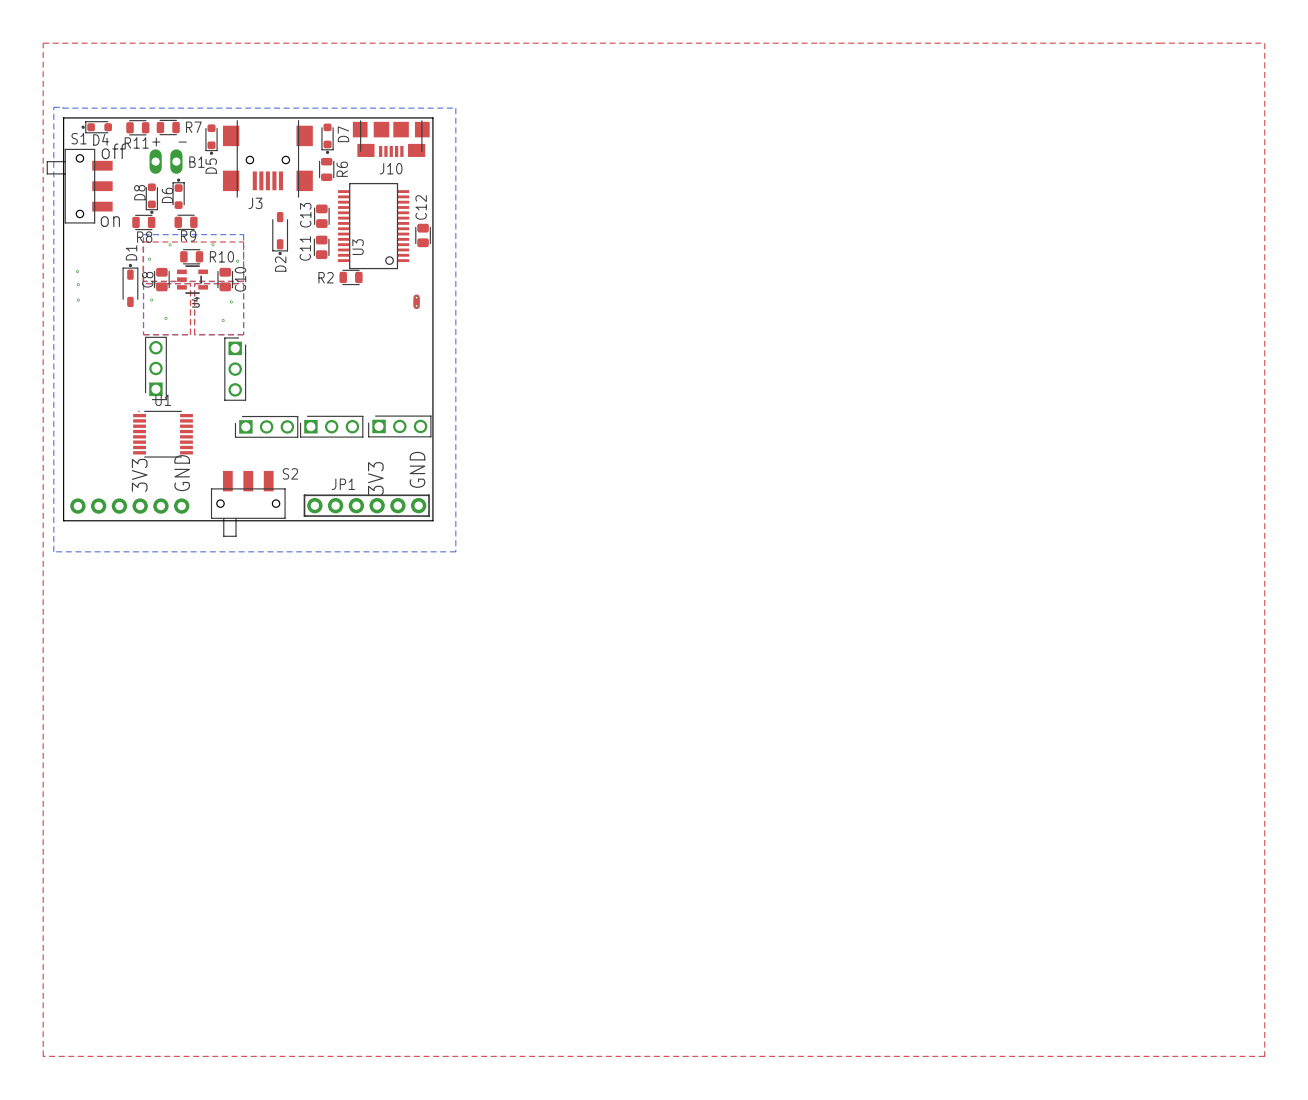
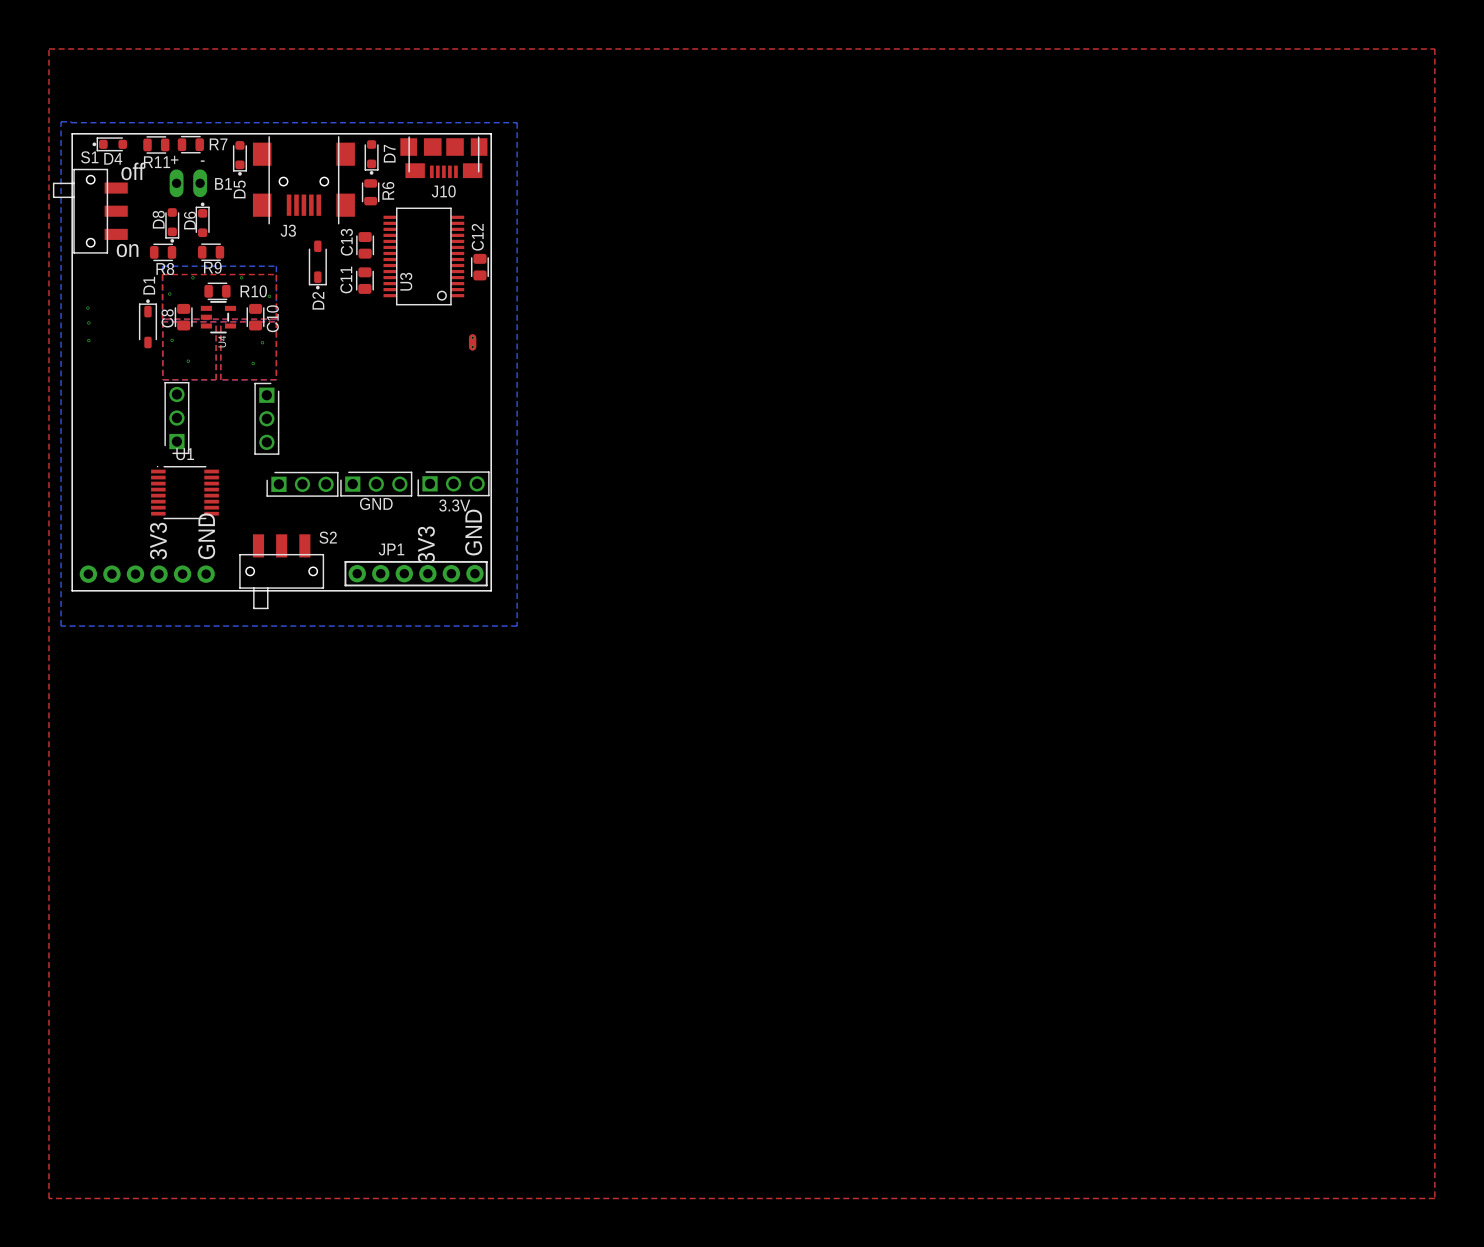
R2: (351, 277) -> none
GND name: none -> GND (376, 503)
3.3V name: none -> 3.3V (454, 505)

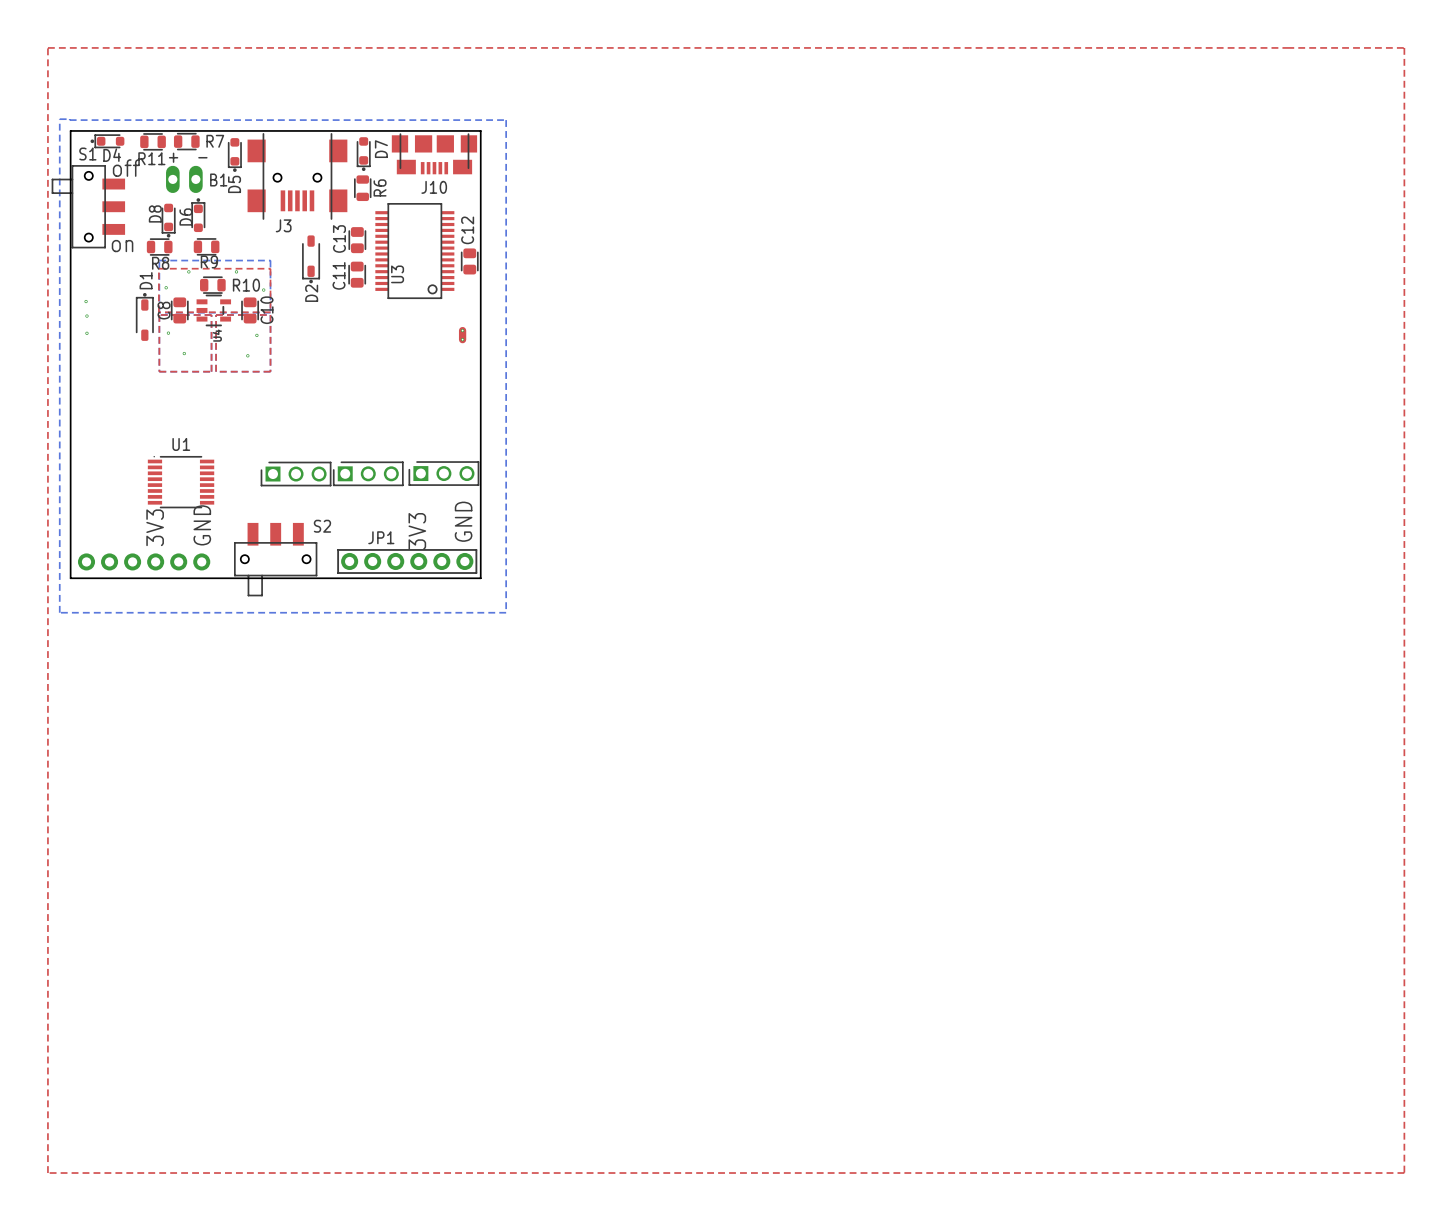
part: (176, 418) -> none
part: (266, 418) -> none
GND name: GND (376, 503) -> none
3.3V name: 3.3V (454, 505) -> none

